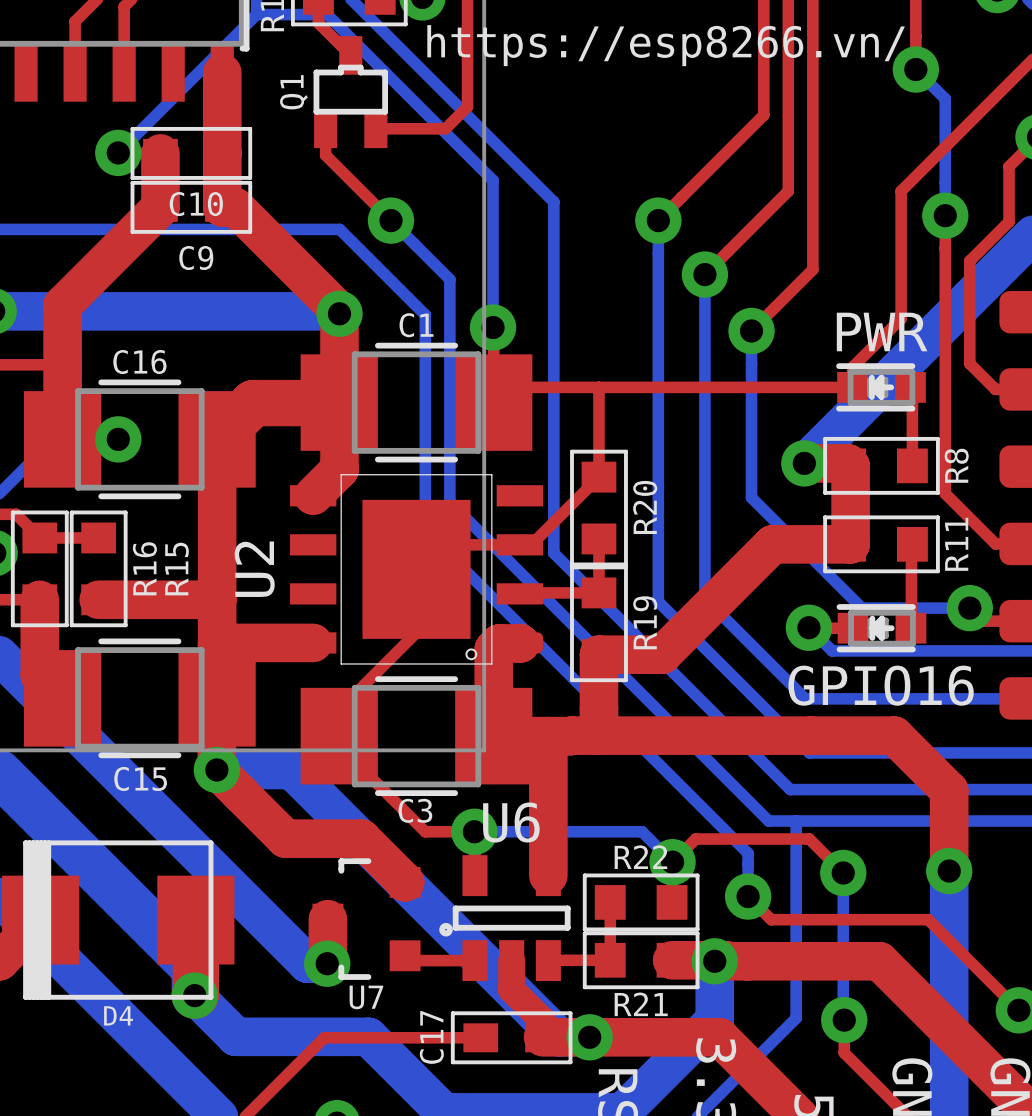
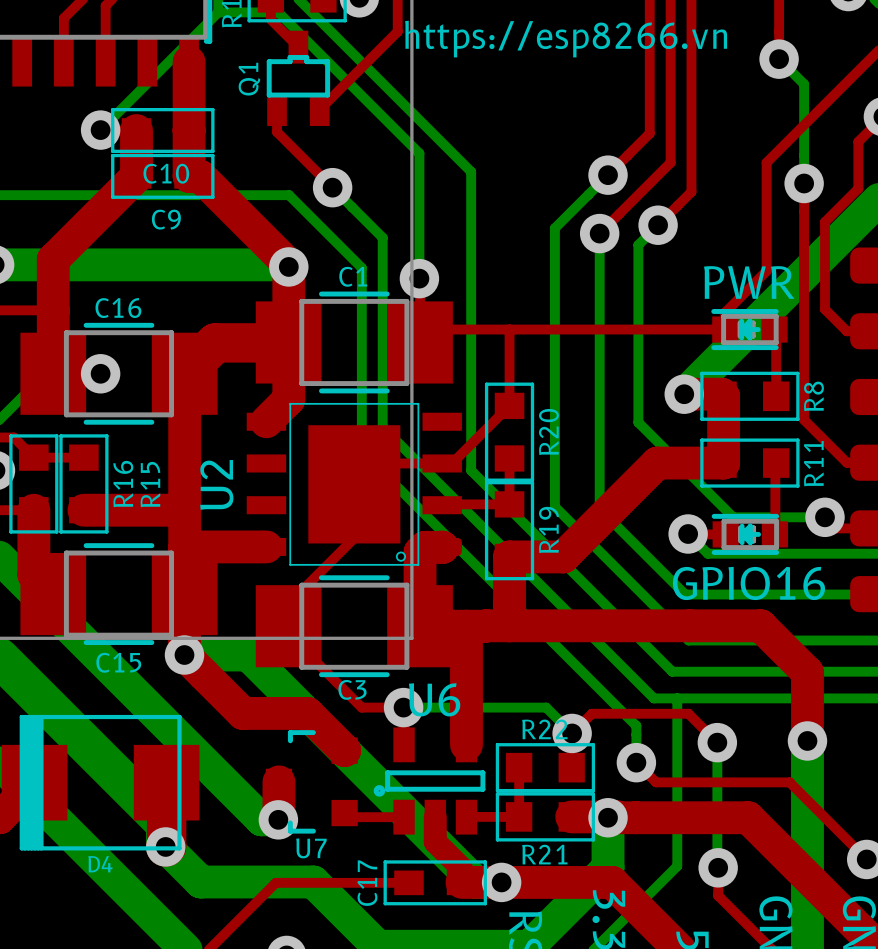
top track: (467, 37) (467, 106) (445, 128) (375, 128) -> (397, 31) (319, 109)
text: https://esp8266.vn/ (666, 45) -> https://esp8266.vn (566, 39)
top track: (763, 115) (658, 220) -> (649, 97) (649, 133) (608, 175)
bottom track: (658, 220) (658, 601) -> (608, 175) (554, 228) (554, 506) (560, 511)
via position: (658, 220) -> (608, 175)
top track: (812, 225) (812, 269) (751, 330) -> (691, 191) (658, 225)
via: none -> (658, 225)
bottom track: (751, 330) (751, 497) -> (658, 225) (638, 244) (639, 423)
via: (751, 330) -> none

